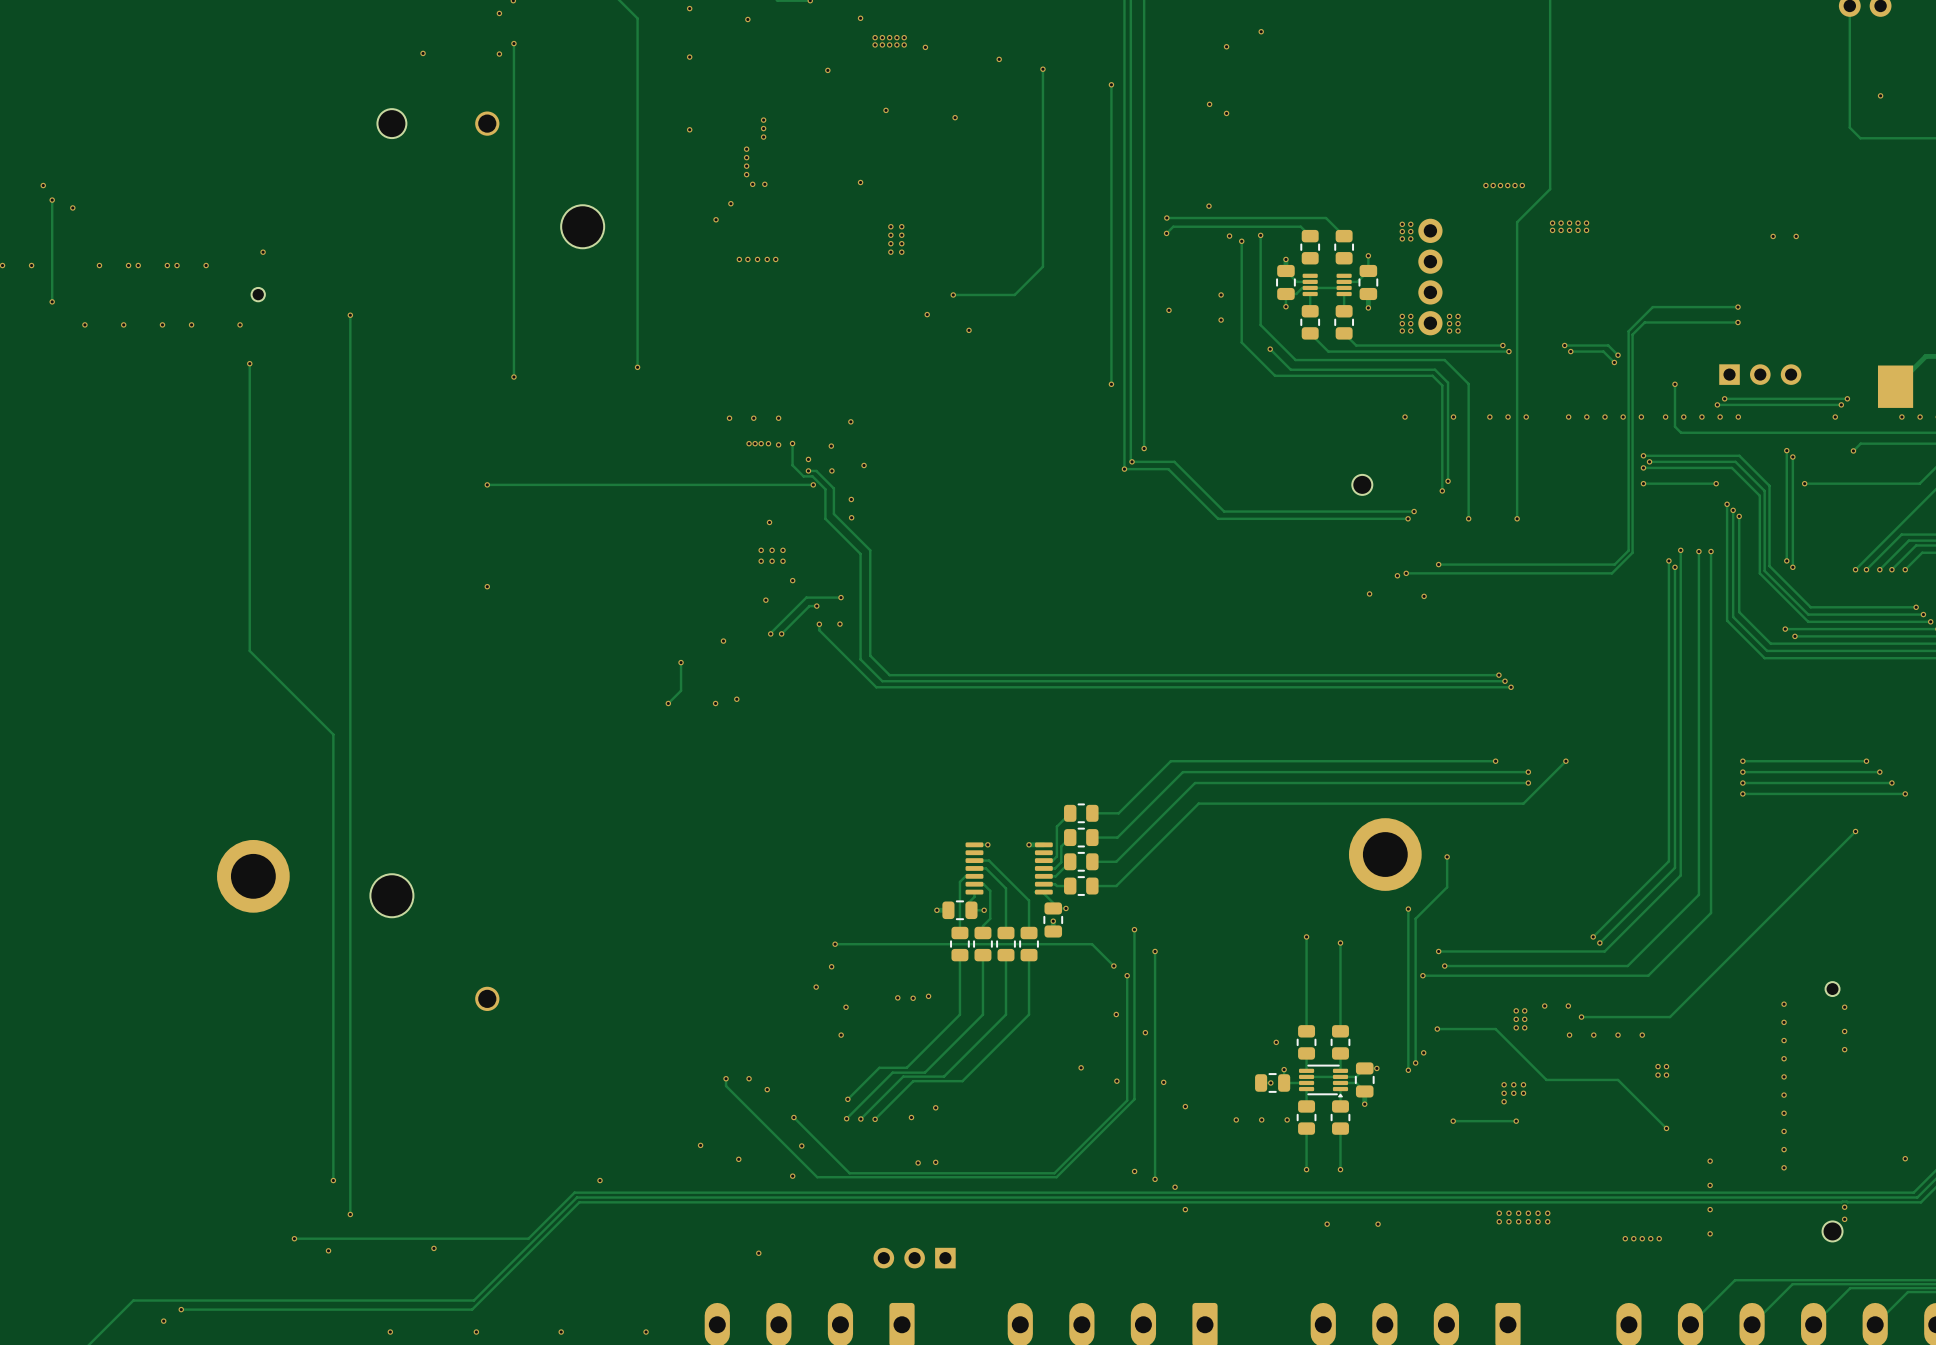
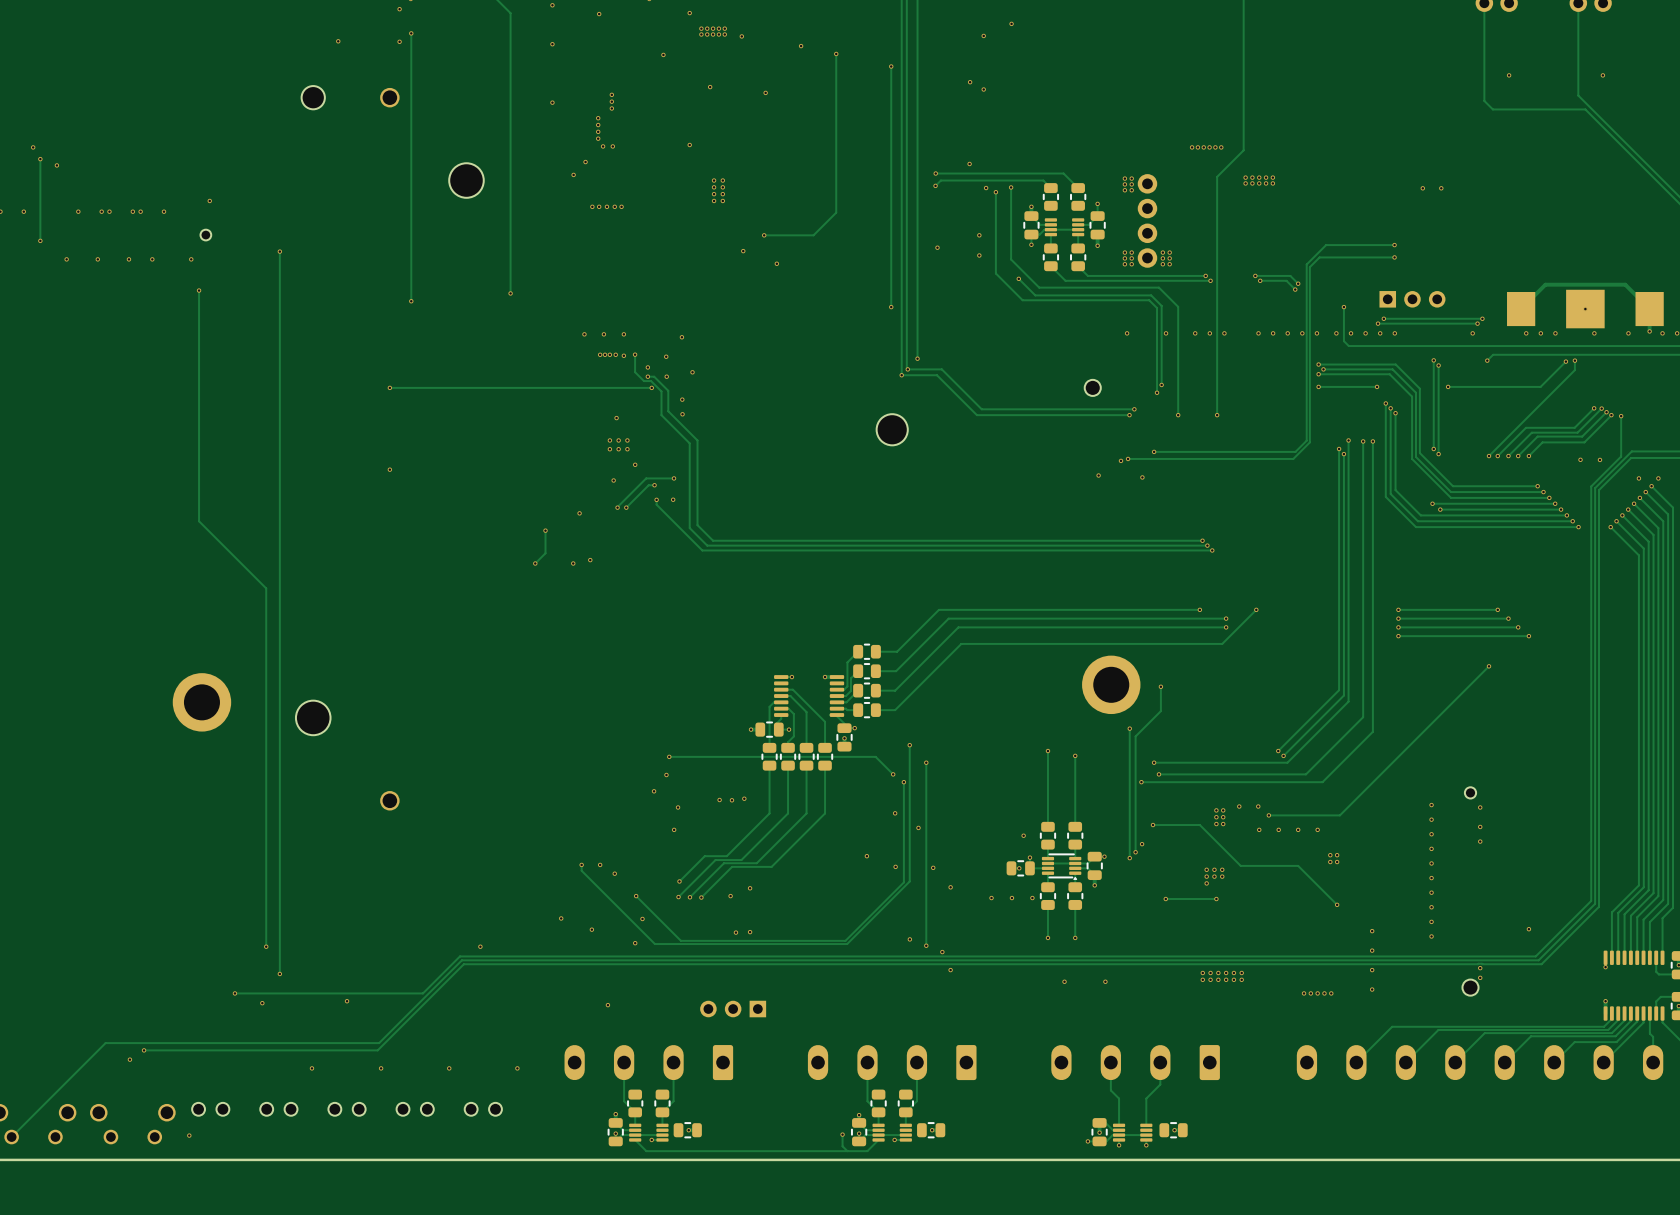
part: none -> (892, 429)

